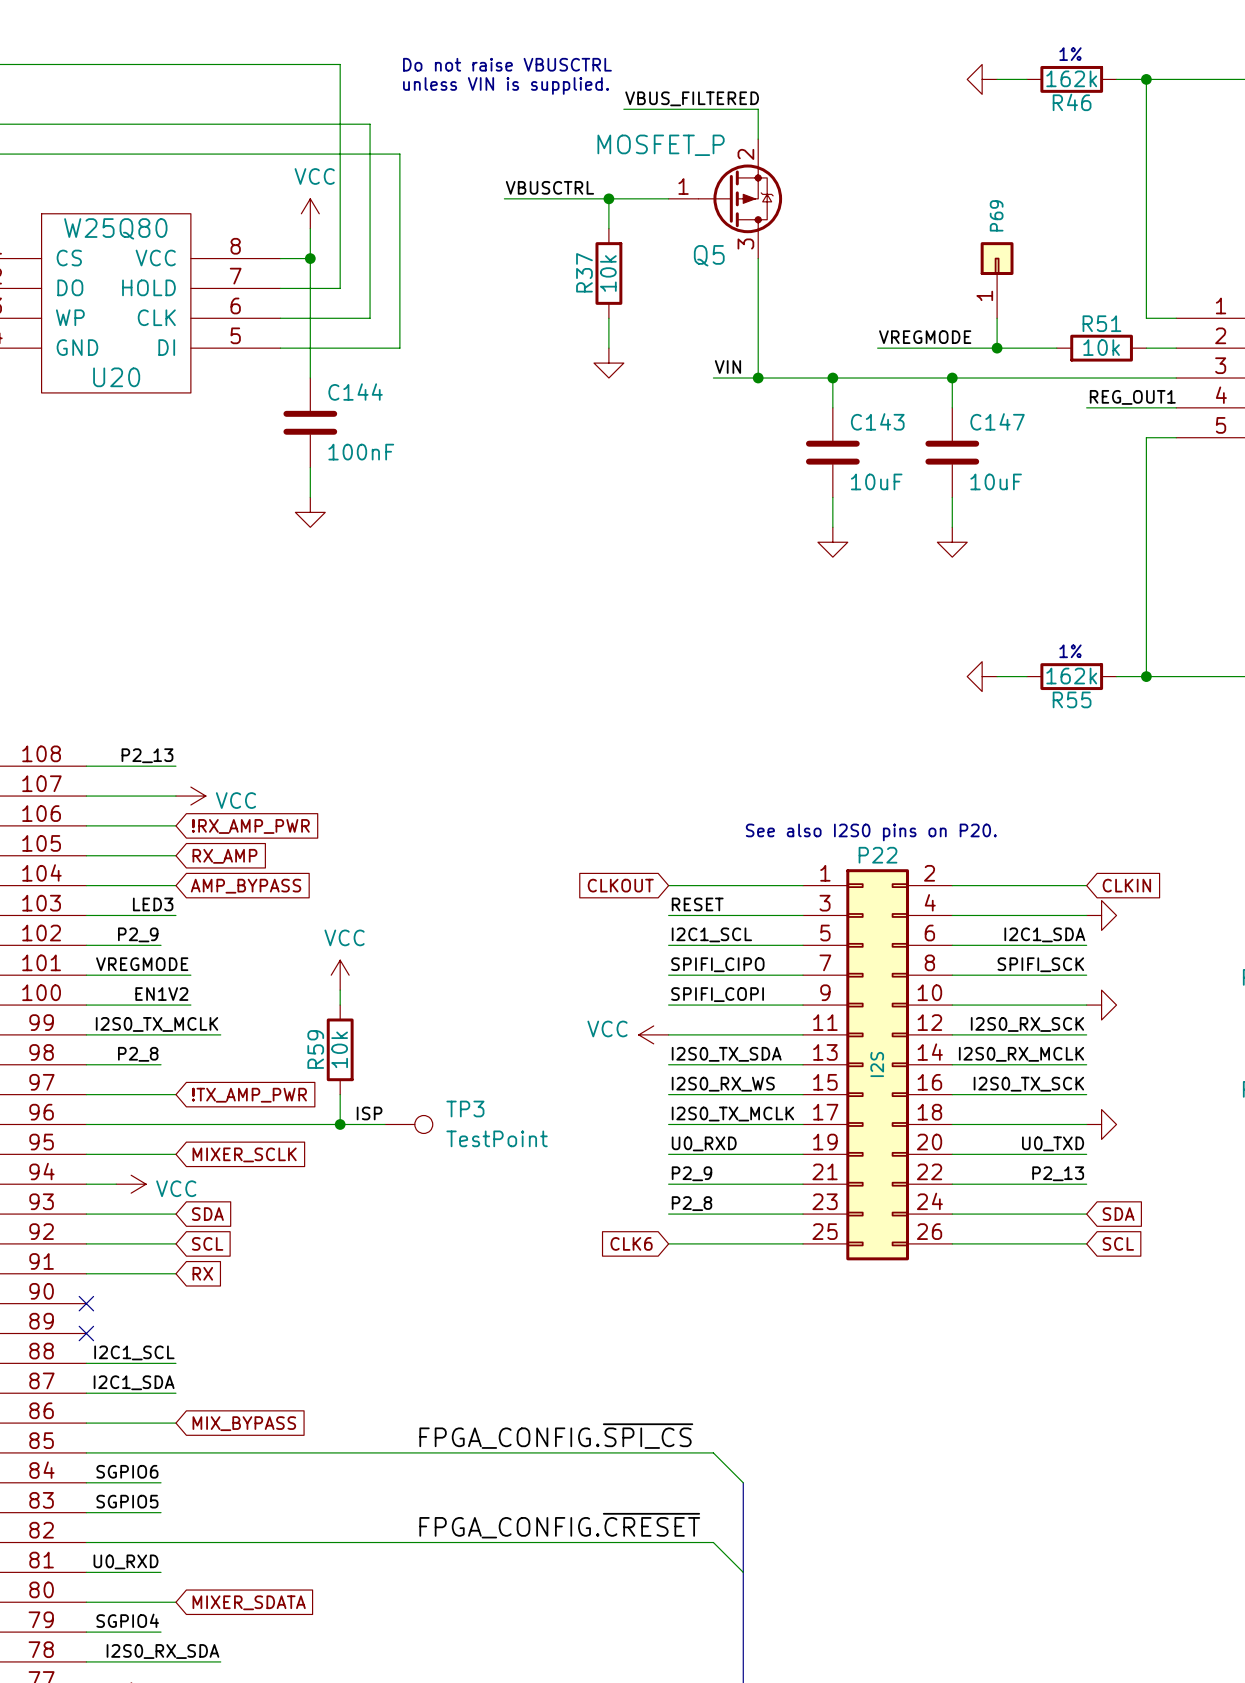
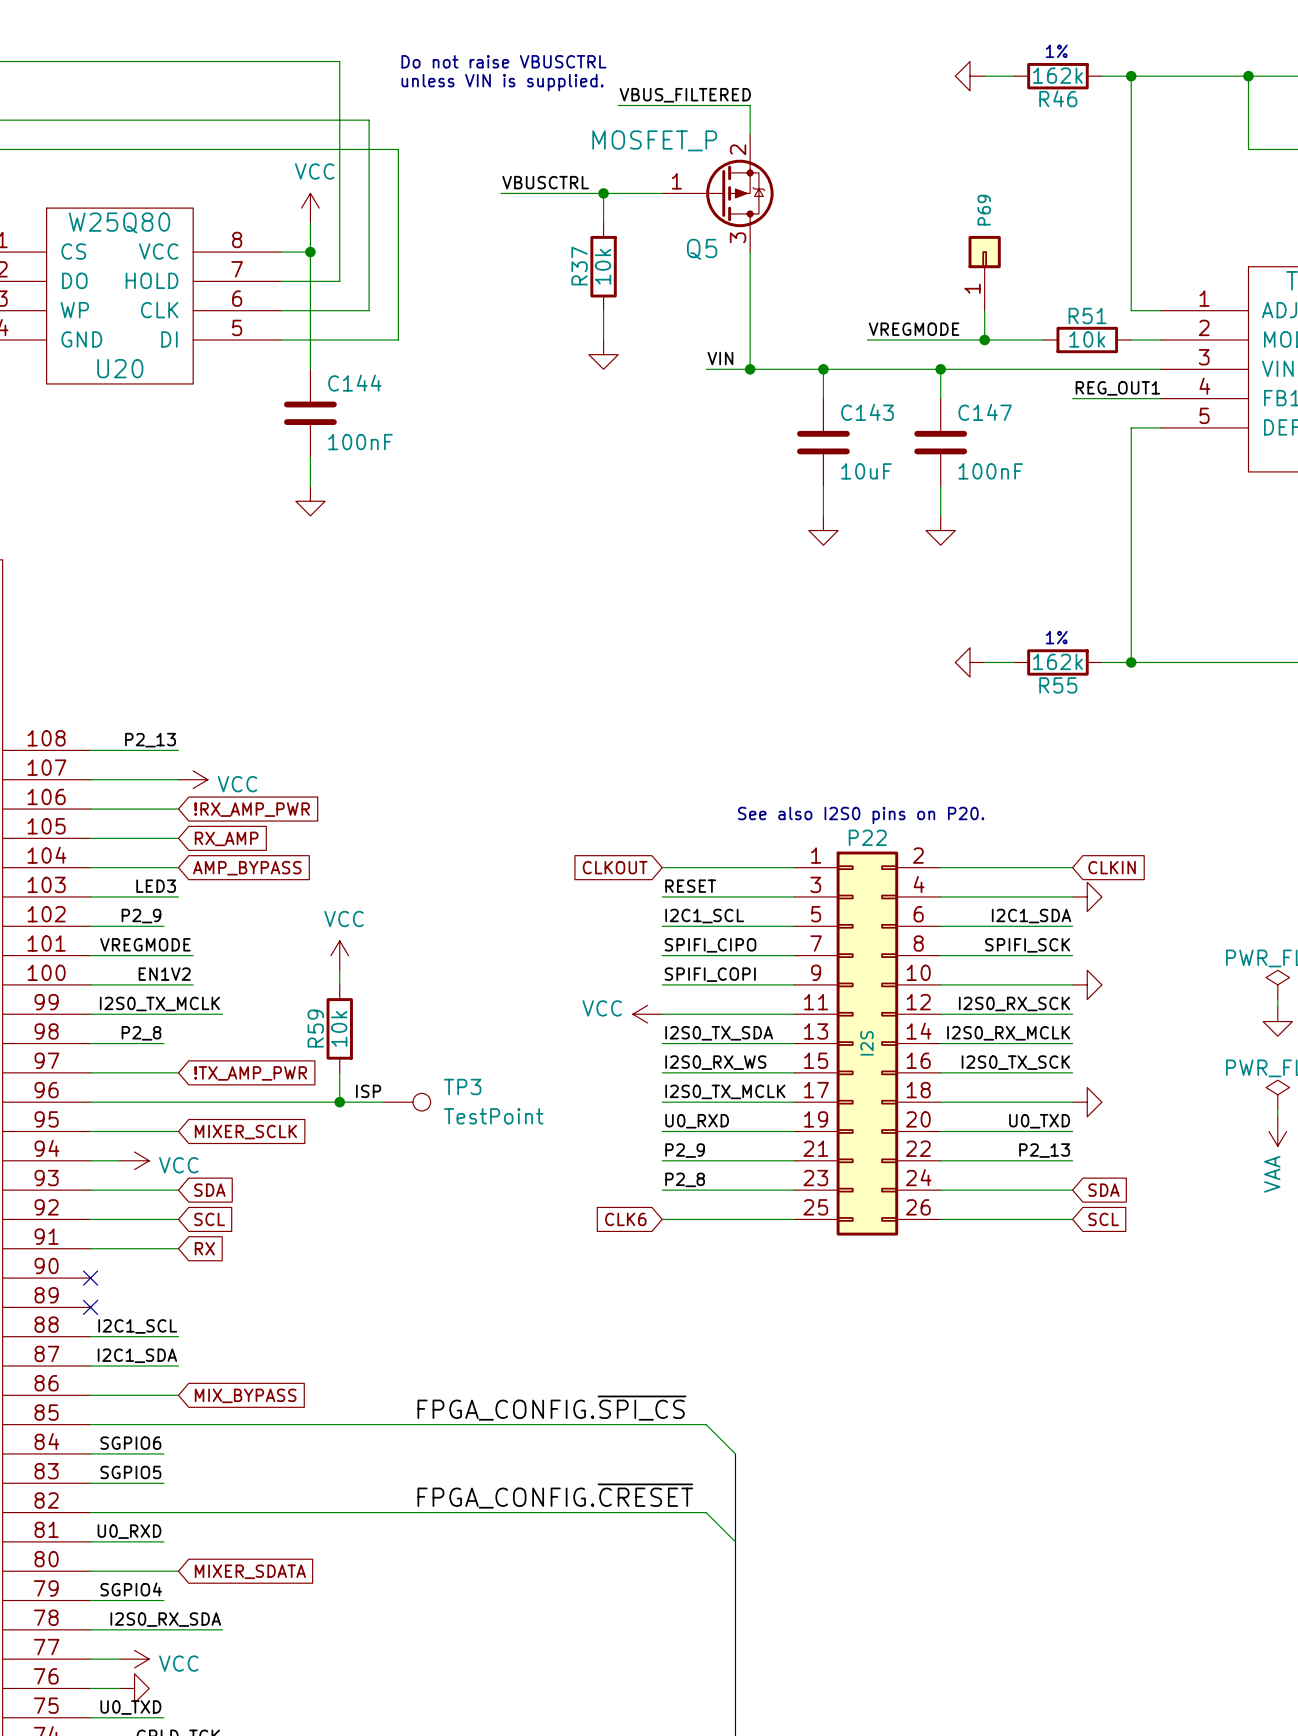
C147 value: 10uF (996, 481) -> 100nF (990, 471)

